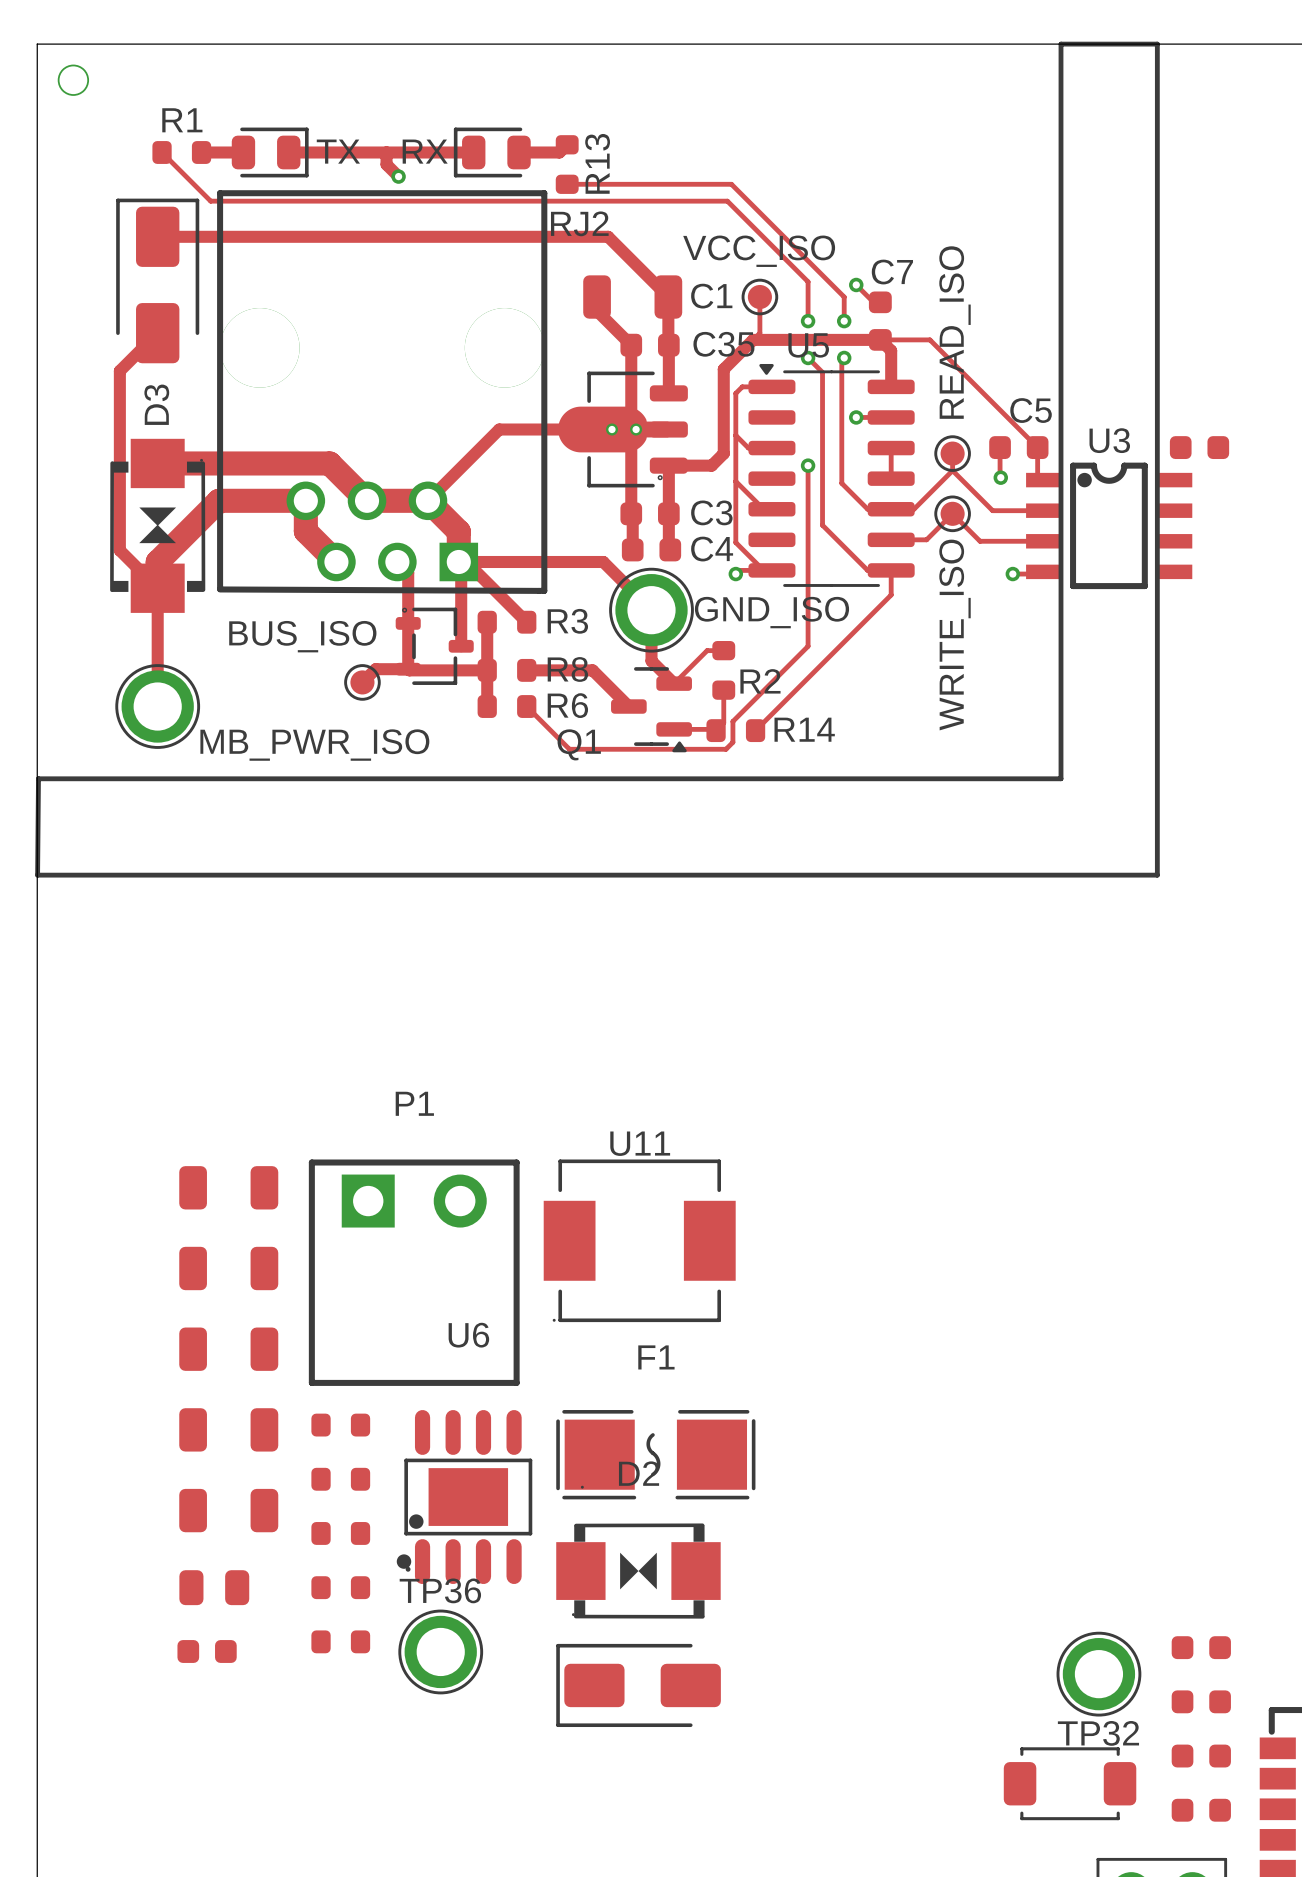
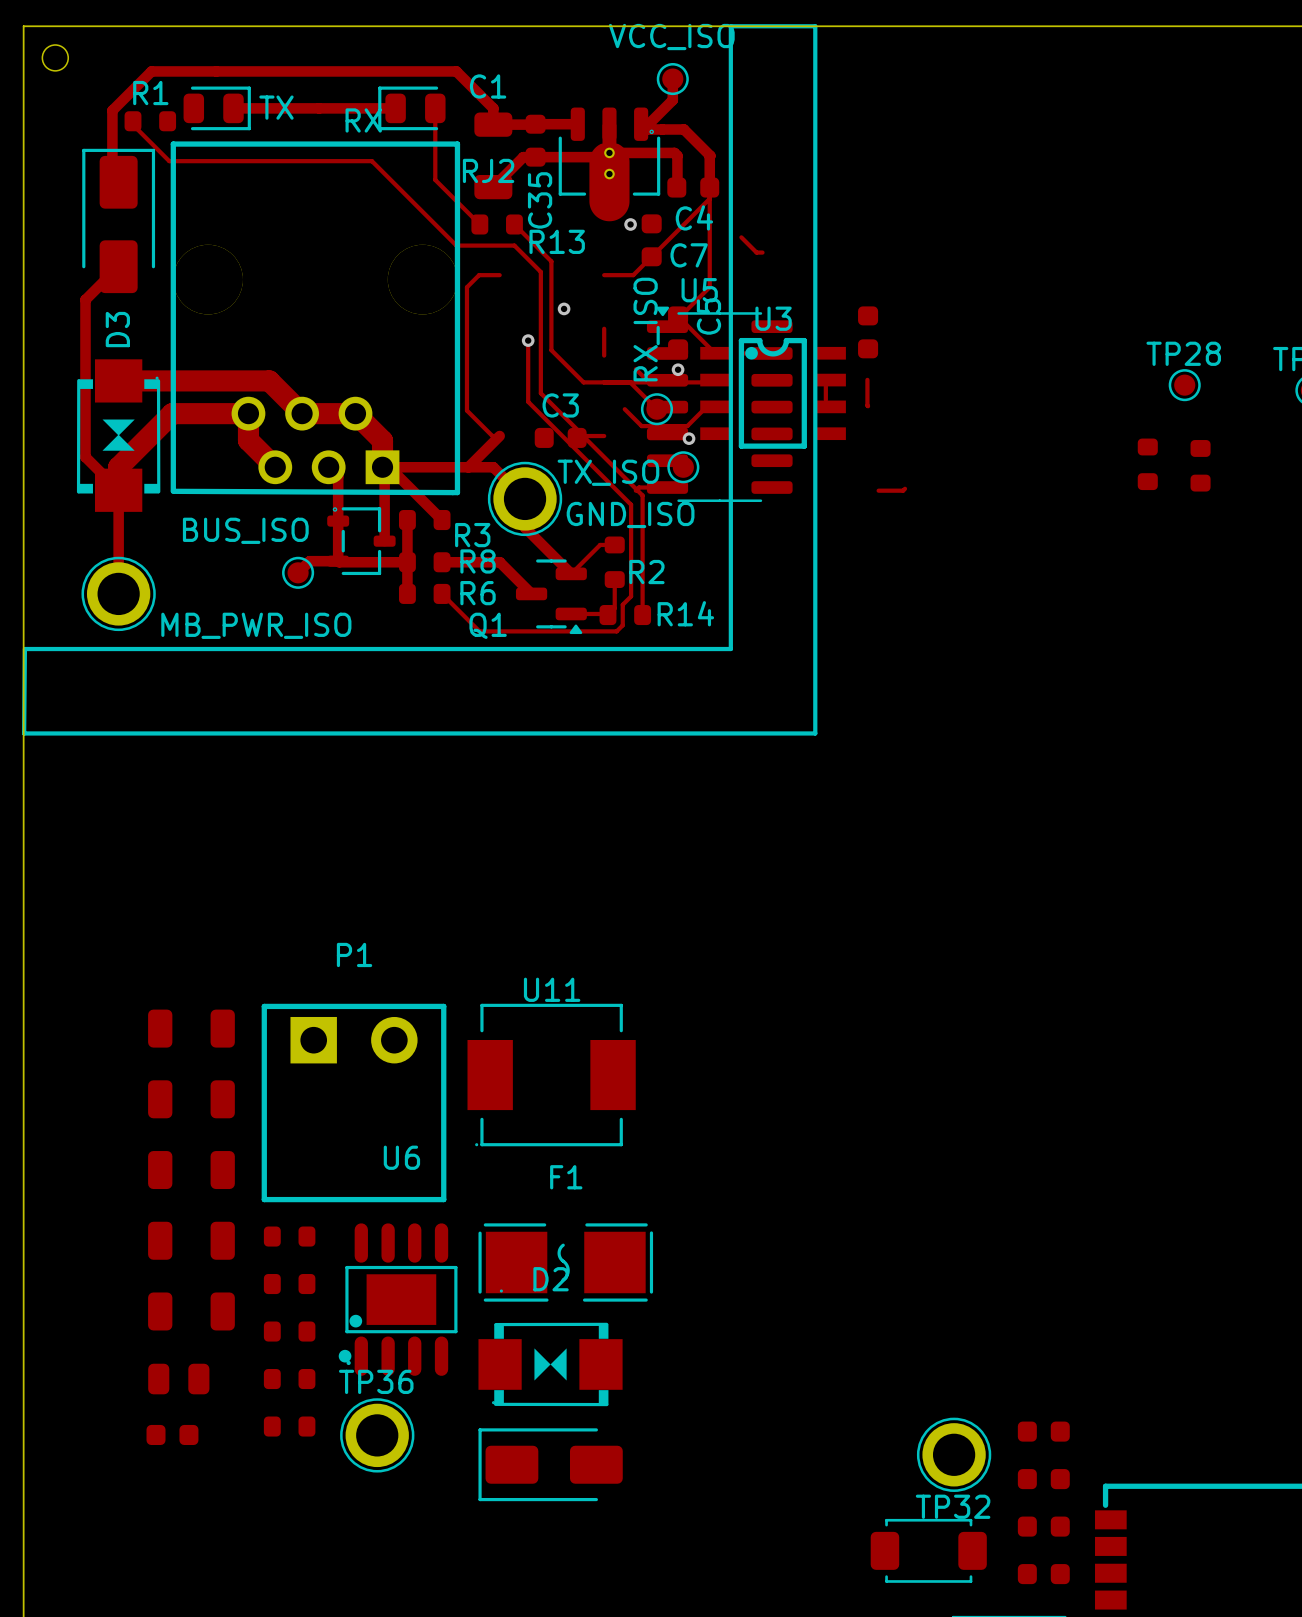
track: none -> (672, 79) (672, 100) (648, 124) (641, 124) (646, 129) (683, 129) (710, 155) (709, 287) (678, 318) (680, 318) (715, 353)
track: none -> (435, 108) (435, 179) (479, 224)
track: (567, 144) (559, 152) (519, 152) -> none
track: (162, 152) (210, 201) (727, 201) (808, 281) (808, 321) -> none
track: (201, 152) (243, 152) -> none
part position: (270, 152) -> (217, 108)
track: (288, 152) (473, 152) -> (233, 108) (395, 108)
track: (386, 152) (386, 164) (398, 176) -> none
part position: (492, 152) -> (411, 108)
track: none -> (136, 122) (130, 122) (169, 161) (371, 161) (456, 245) (514, 245) (540, 271) (540, 393) (583, 436)
track: none -> (577, 124) (493, 124) (493, 108) (456, 71) (151, 71) (112, 110) (112, 176) (118, 182)
R13 rotation: 0° (567, 164) -> 90° clockwise (497, 224)
R13 position: (567, 164) -> (497, 224)
via: (398, 176) -> none
track: (567, 184) (731, 184) (844, 297) (844, 321) -> none
track: none -> (493, 187) (523, 157) (605, 157) (609, 152) (674, 152) (677, 155) (676, 187)
track: (157, 236) (608, 236) (668, 297) (668, 393) -> none
track: none -> (709, 198) (633, 275) (604, 275)
track: none -> (514, 224) (551, 261) (551, 350) (583, 382) (712, 382) (715, 380)
via: none -> (630, 224)
C7 name position: C7 (892, 272) -> C7 (689, 255)
part position: (157, 280) -> (118, 220)
via: (856, 284) -> none
C1 name position: C1 (711, 296) -> C1 (488, 86)
track: (597, 297) (597, 310) (631, 345) (631, 424) (636, 429) -> none
C1 rotation: 0° (632, 297) -> 90° clockwise (493, 155)
C1 position: (632, 297) -> (493, 155)
track: (759, 297) (759, 333) (753, 339) -> none
part position: (759, 297) -> (672, 79)
via: (808, 321) -> none
via: (844, 321) -> none
C7 position: (880, 321) -> (651, 240)
track: none -> (499, 275) (479, 275) (466, 287) (466, 410) (492, 436) (499, 436) (468, 467)
track: (157, 333) (119, 370) (119, 550) (157, 588) -> (118, 266) (85, 299) (85, 457) (118, 490)
track: (753, 339) (723, 369) (723, 453) (711, 465) (668, 465) (670, 549) -> none
track: (753, 339) (880, 339) -> none
track: (880, 339) (891, 350) (891, 386) -> none
track: (880, 339) (929, 339) (1037, 447) (1037, 474) (1042, 480) -> none
C35 rotation: 0° (650, 345) -> 90° clockwise (535, 140)
C35 position: (650, 345) -> (535, 140)
track: (808, 357) (822, 372) (822, 525) (867, 570) (891, 570) (891, 594) (755, 730) -> none
via: (808, 357) -> none
track: (844, 357) (841, 360) (841, 483) (867, 509) (913, 509) (952, 470) (992, 510) (1042, 510) -> none
via: (844, 357) -> none
via: none -> (564, 308)
track: (771, 386) (742, 386) (735, 393) (735, 542) (763, 570) -> none
RJ2 position: (382, 392) -> (315, 318)
track: none -> (528, 340) (528, 401) (631, 504) (631, 596) (622, 604) (622, 625) (616, 631) (479, 631) (442, 593)
via: none -> (528, 340)
via: (856, 417) -> none
part rotation: 0° (623, 429) -> 90° counterclockwise (609, 164)
part position: (623, 429) -> (609, 164)
track: (636, 429) (631, 434) (632, 549) -> none
track: (636, 429) (499, 429) (427, 500) -> none
via: none -> (678, 369)
C5 rotation: 0° (1018, 447) -> 90° clockwise (678, 332)
C5 position: (1018, 447) -> (678, 332)
part rotation: 0° (1199, 447) -> 90° clockwise (868, 332)
part position: (1199, 447) -> (868, 332)
track: none -> (118, 380) (269, 380) (302, 413) (355, 413) (382, 440) (382, 467)
track: (891, 448) (891, 478) -> (604, 328) (604, 355)
track: none -> (630, 382) (656, 409)
part: READ_ISO (952, 453) -> none
track: (157, 463) (329, 463) (367, 500) (427, 500) -> none
track: (808, 465) (808, 646) (732, 721) (732, 742) (726, 749) (569, 749) (526, 706) -> none
via: (808, 465) -> none
via: (1000, 477) -> none
track: none -> (715, 406) (706, 406) (687, 426) (641, 426) (624, 409)
track: (735, 481) (763, 509) (771, 509) -> none
part: none -> RX_ISO (656, 409)
track: (427, 500) (458, 531) (458, 561) -> none
track: none -> (604, 436) (583, 436) (642, 495) (642, 615)
C3 name position: C3 (711, 512) -> C3 (560, 405)
part: WRITE_ISO (952, 513) -> none
via: none -> (689, 438)
D3 position: (157, 525) -> (118, 435)
U3 position: (1109, 525) -> (773, 393)
track: (891, 539) (926, 539) (952, 513) (980, 541) (1042, 541) -> none
track: none -> (382, 467) (493, 467) (525, 498) (525, 527) (571, 573) (600, 544) (614, 544)
part: none -> TX_ISO (683, 467)
C4 position: (651, 549) -> (693, 187)
C4 name position: C4 (712, 549) -> C4 (694, 217)
track: (336, 561) (305, 531) (305, 500) (218, 500) (157, 561) (157, 588) -> (275, 467) (248, 440) (248, 413) (172, 413) (118, 467) (118, 490)
track: (397, 561) (408, 572) (408, 669) -> (328, 467) (338, 476) (338, 561)
track: (458, 561) (461, 564) (461, 646) -> (382, 467) (384, 469) (384, 541)
track: (458, 561) (603, 561) (651, 610) (651, 660) (674, 683) (707, 650) (723, 650) -> none
track: (466, 561) (526, 622) -> (389, 467) (442, 520)
via: (735, 574) -> none
via: (1012, 574) -> none
track: (157, 588) (157, 706) -> (118, 490) (118, 593)
part position: (651, 610) -> (525, 498)
part value position: GND_ISO (771, 612) -> GND_ISO (630, 514)
R3 name position: R3 (567, 621) -> R3 (472, 535)
track: (487, 622) (487, 706) -> (407, 520) (407, 593)
R3 position: (506, 622) -> (424, 520)
part position: (434, 646) -> (361, 541)
track: (408, 669) (375, 669) (362, 682) -> (338, 561) (309, 561) (298, 572)
track: (408, 669) (487, 670) -> (338, 561) (407, 562)
R8 position: (506, 670) -> (424, 562)
track: (526, 670) (592, 670) (628, 706) -> (442, 562) (499, 562) (531, 593)
R2 position: (723, 670) -> (614, 562)
part position: (362, 682) -> (298, 572)
track: (723, 690) (723, 722) (716, 730) (674, 729) -> (614, 579) (614, 608) (607, 615) (571, 613)
part position: (157, 706) -> (118, 593)
R6 position: (506, 706) -> (424, 593)
Q1 position: (651, 709) -> (551, 596)
R14 position: (735, 730) -> (625, 615)
line: (38, 778) (1061, 778) (1061, 44) (1157, 44) (1157, 875) (37, 875) (37, 851) -> (24, 670) (24, 649) (730, 649) (730, 26) (815, 26) (815, 733) (24, 733)

